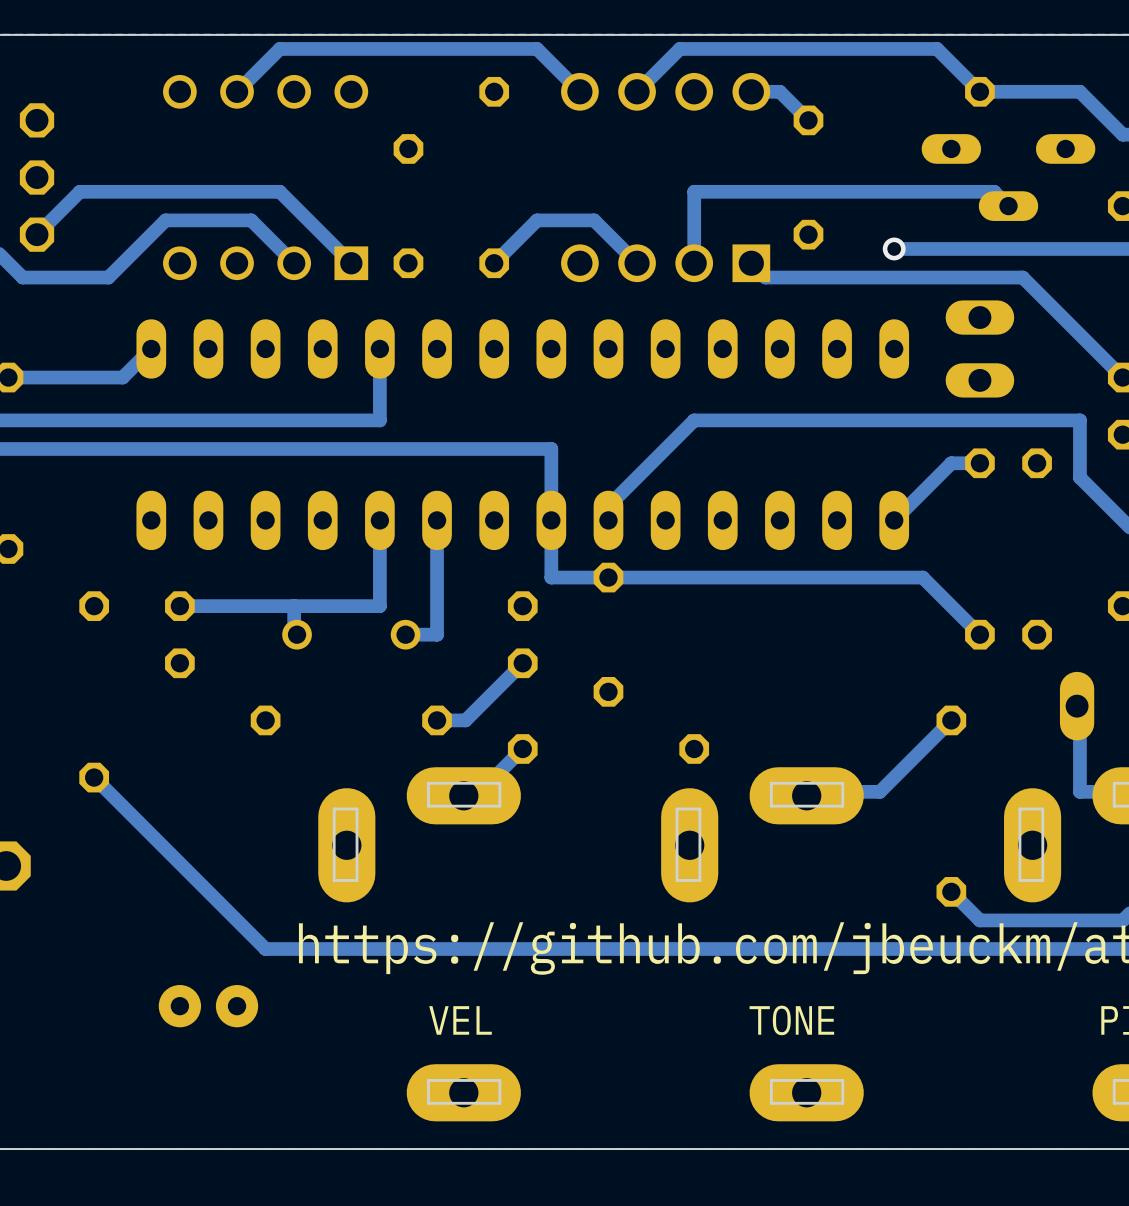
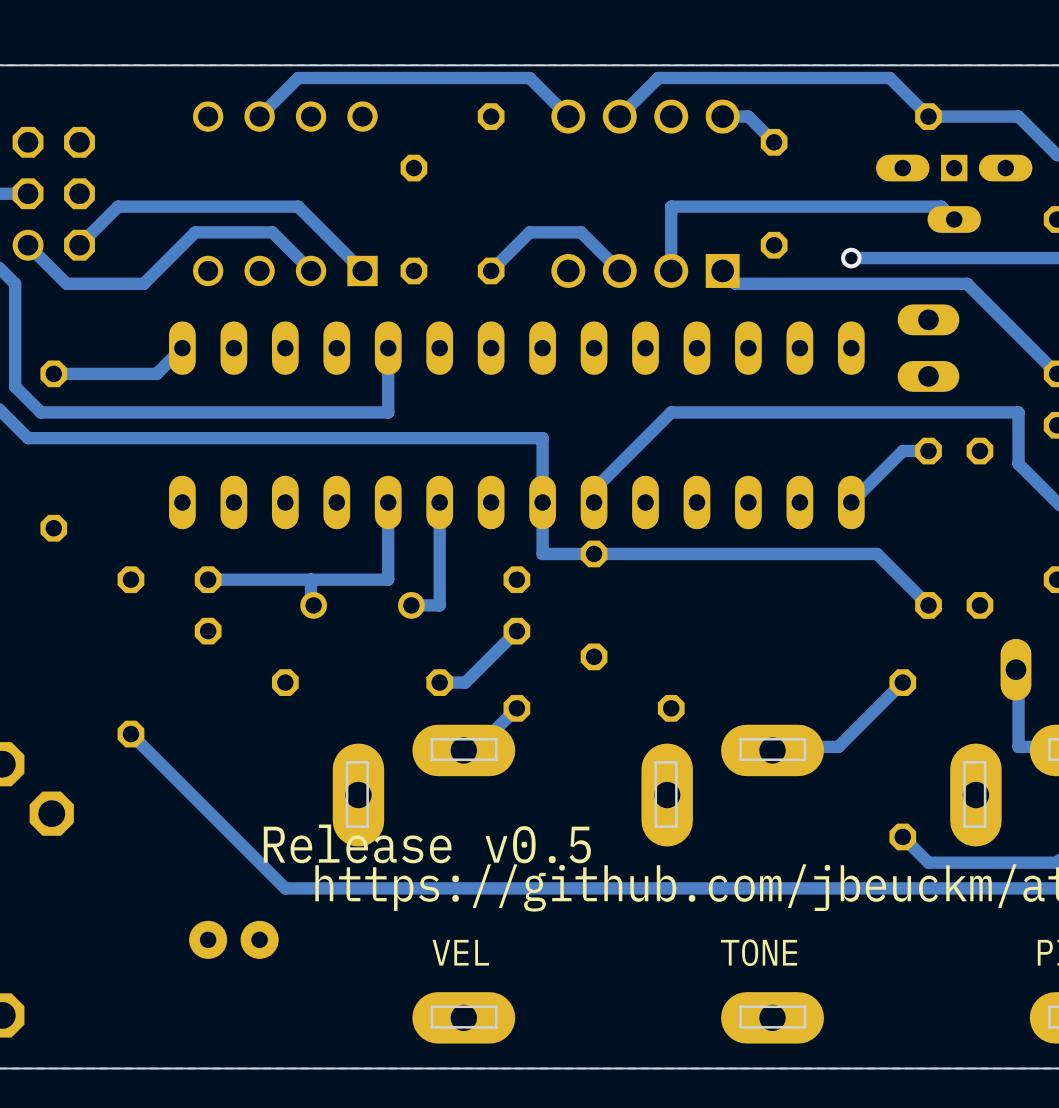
part footprint: [921, 134, 1096, 221] -> [876, 154, 1033, 233]
text: none -> Release v0.5 (427, 843)

